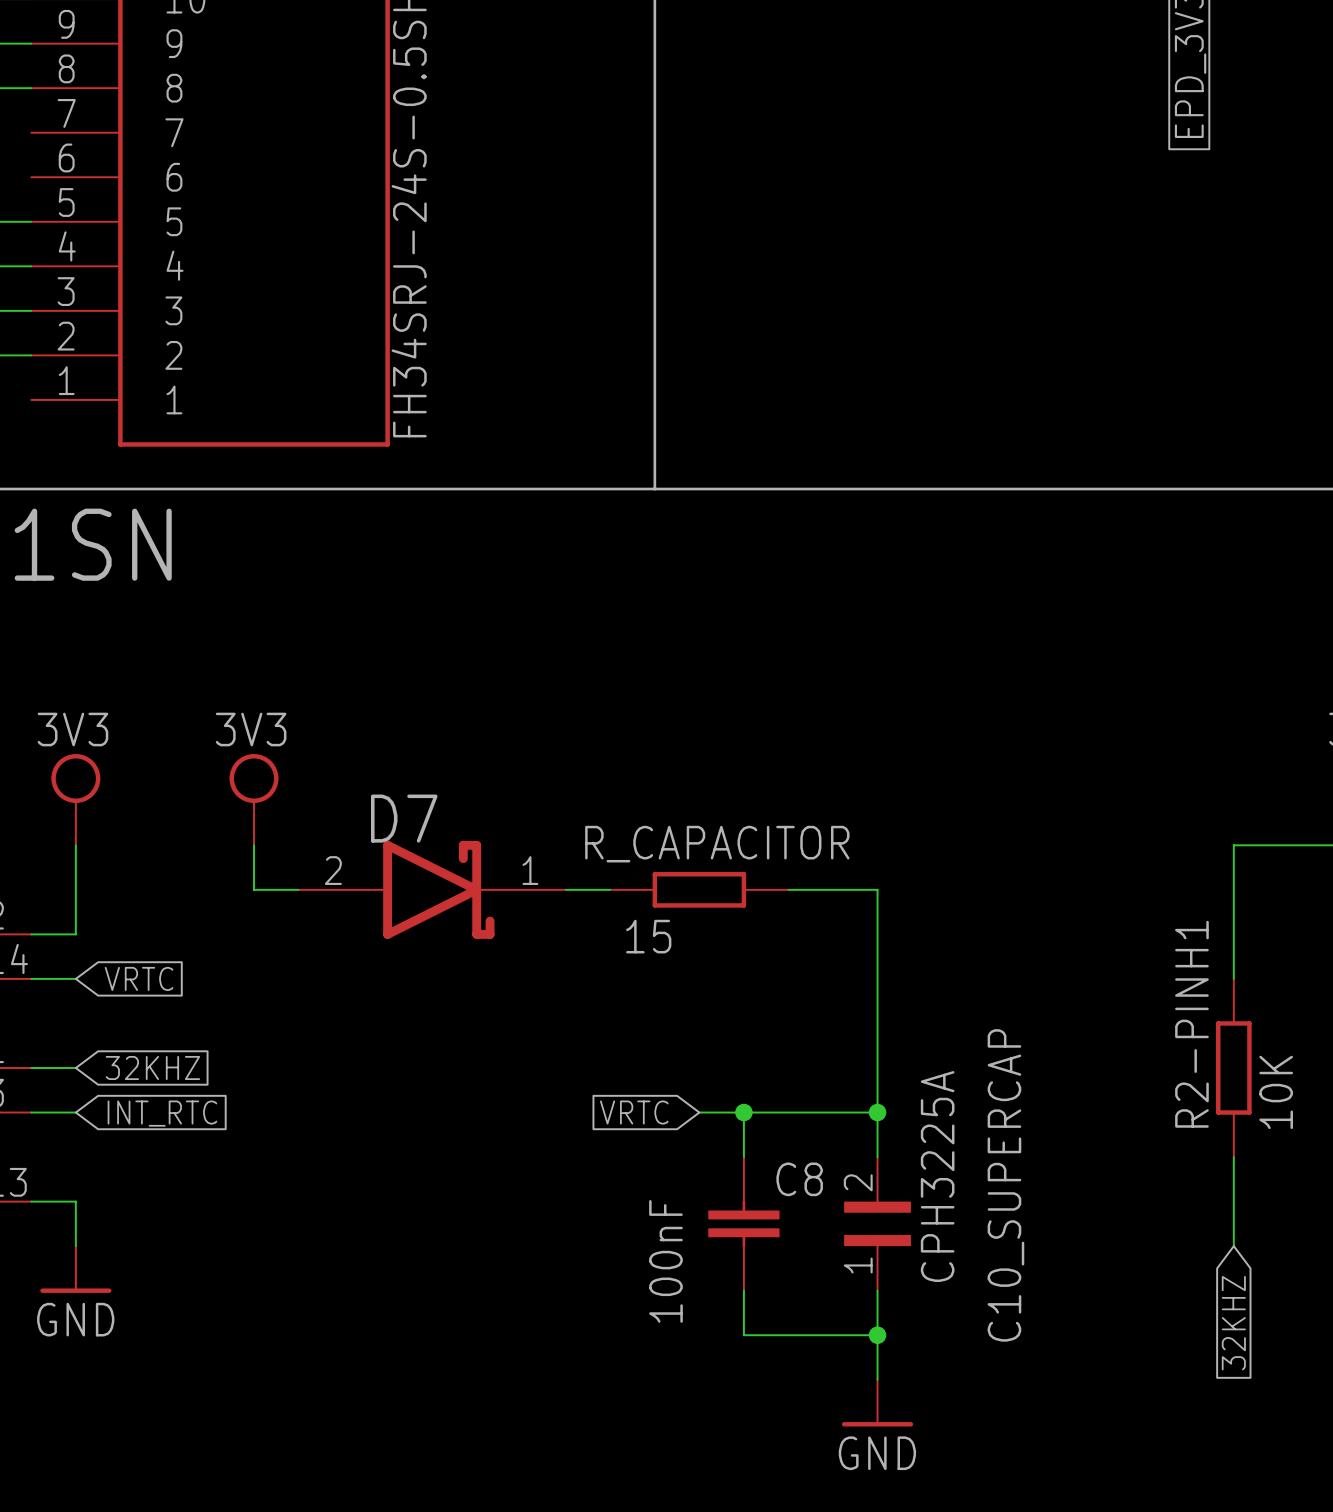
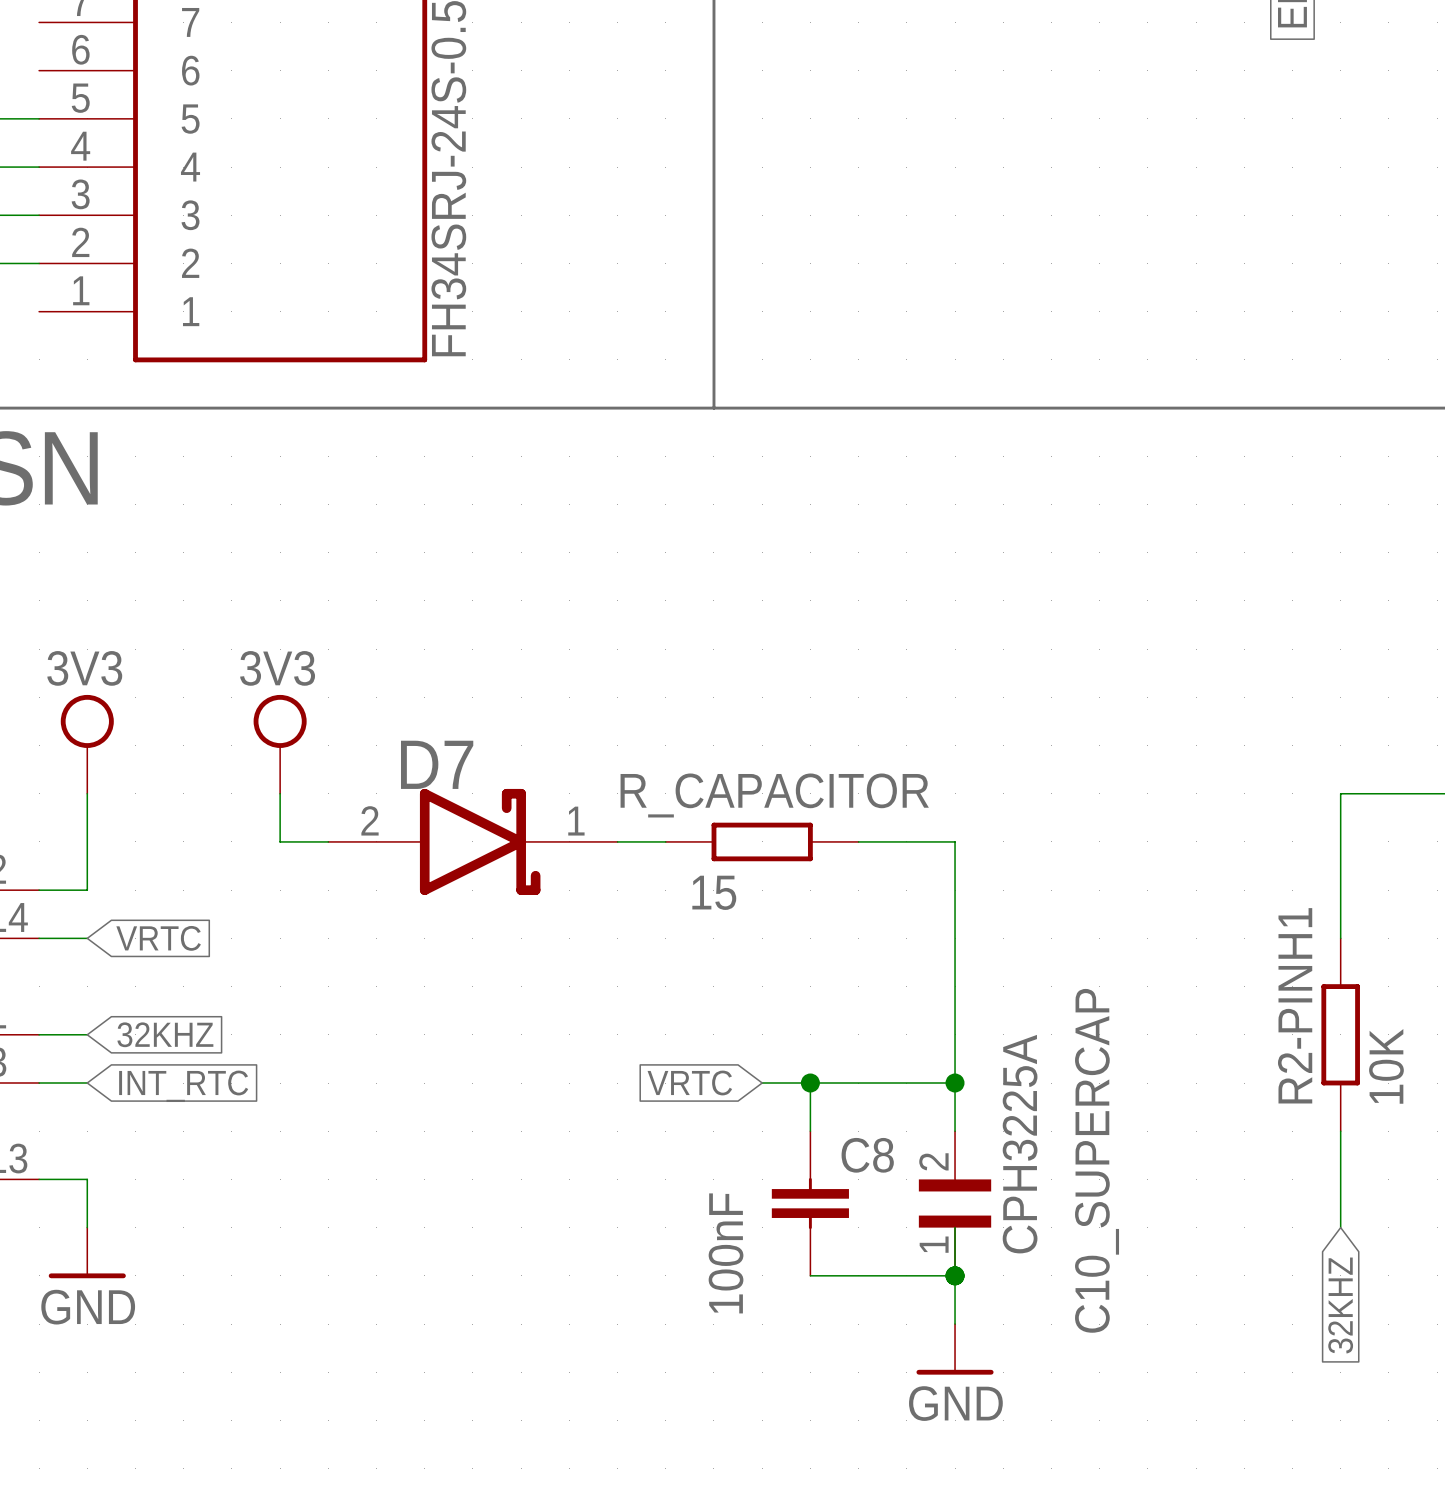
wire: (743, 1290) (743, 1335) (877, 1335) (877, 1379) -> (810, 1275) (955, 1275) (955, 1227)
junction position: (877, 1335) -> (955, 1275)
power symbol position: GND (877, 1403) -> GND (955, 1349)

